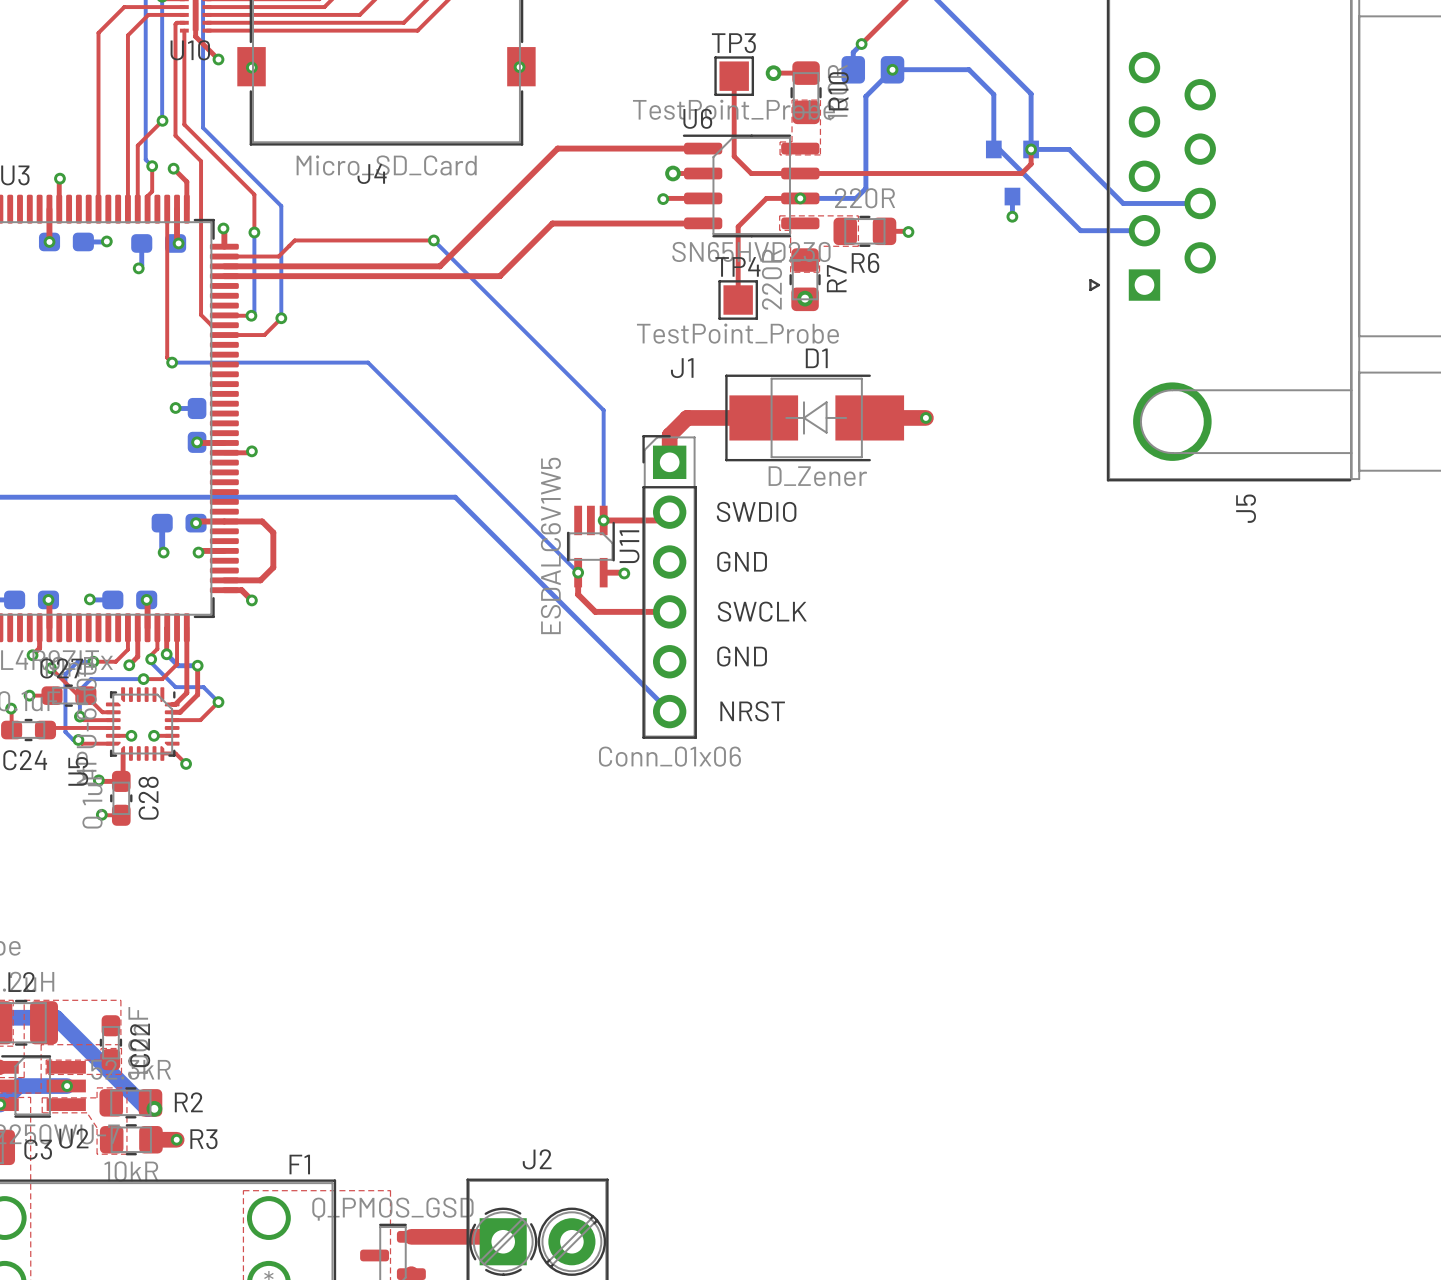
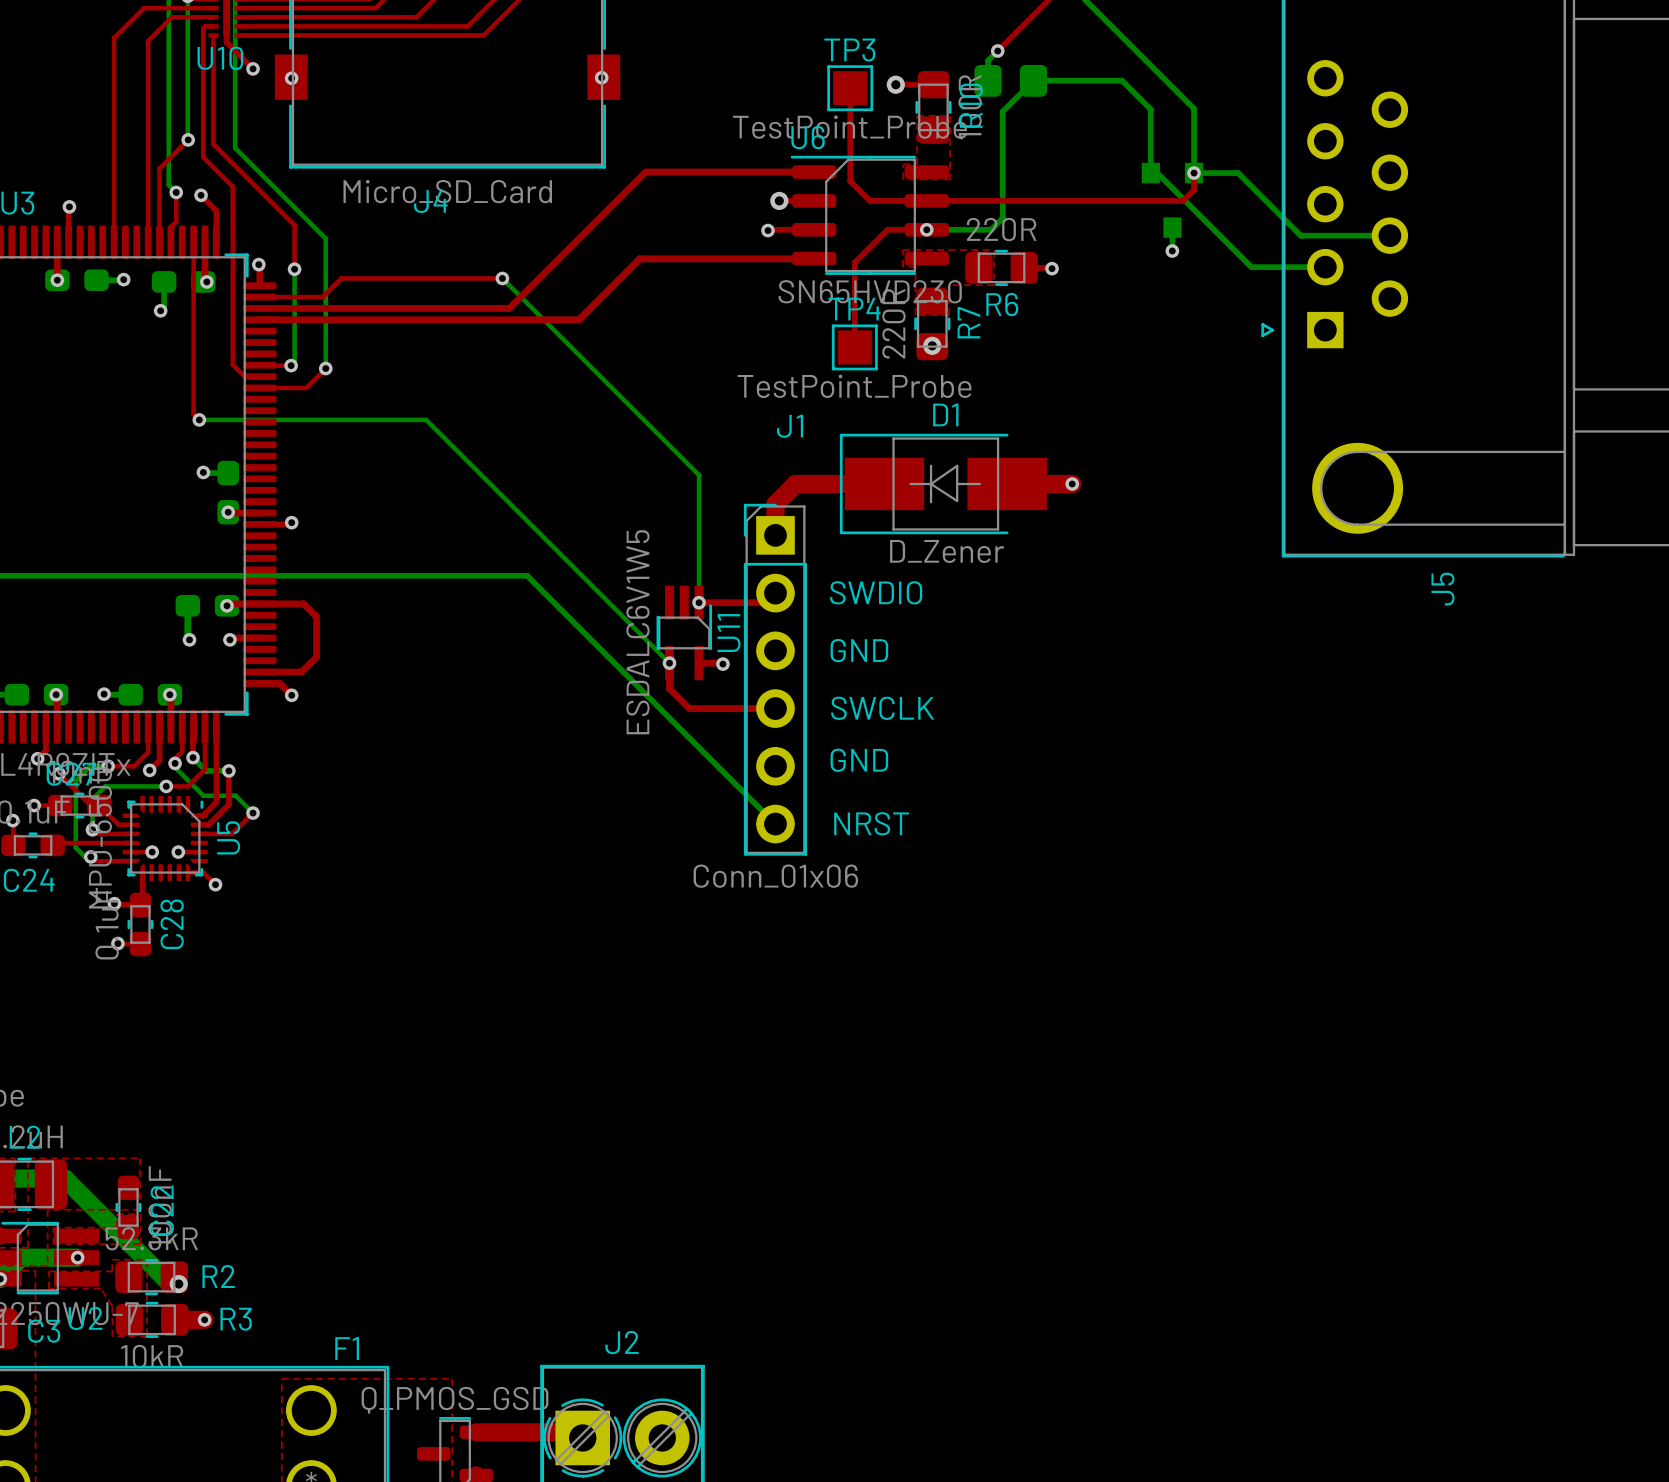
via: (892, 69) -> none
U5 name position: U5 (78, 771) -> U5 (228, 837)

